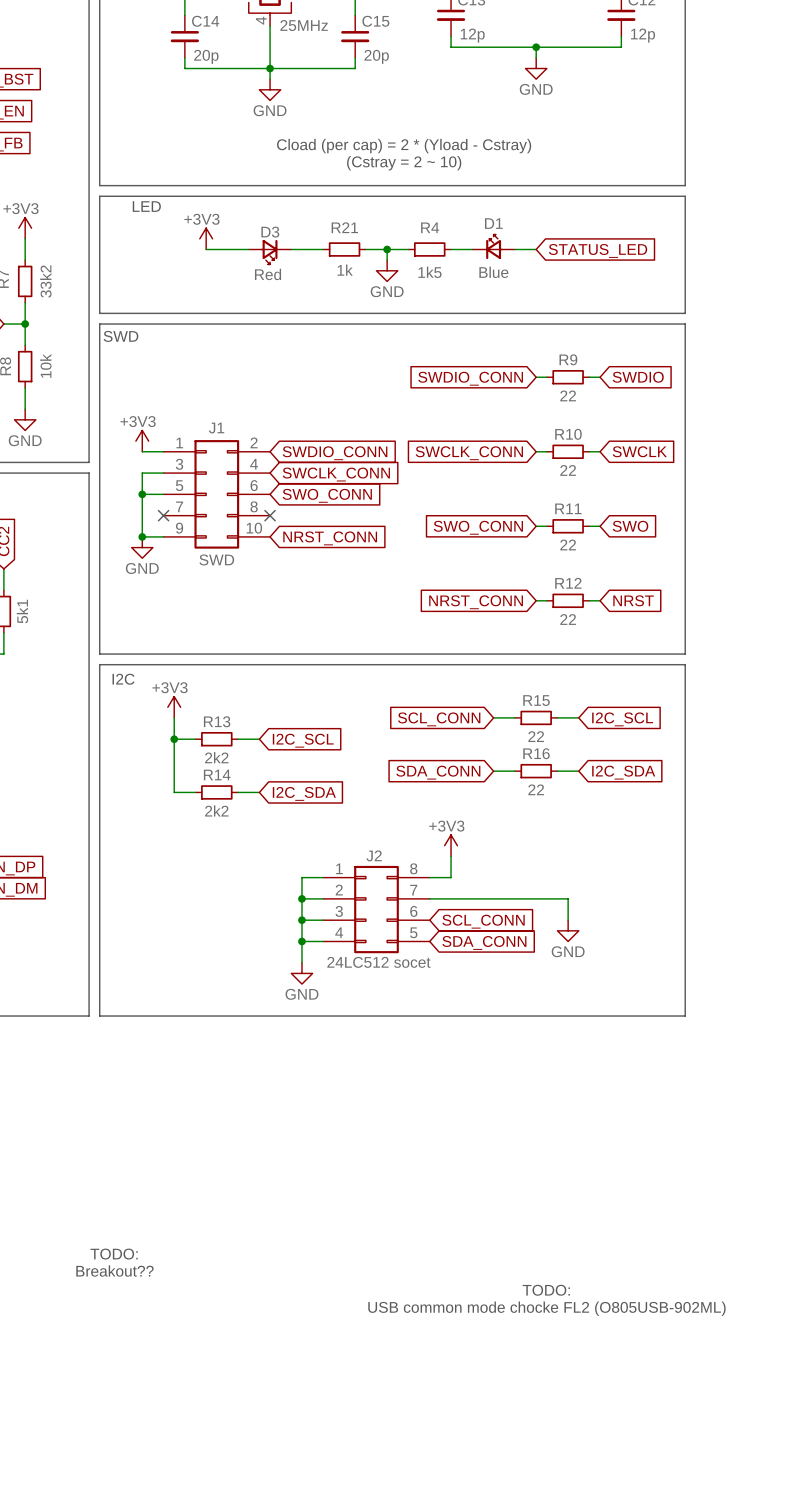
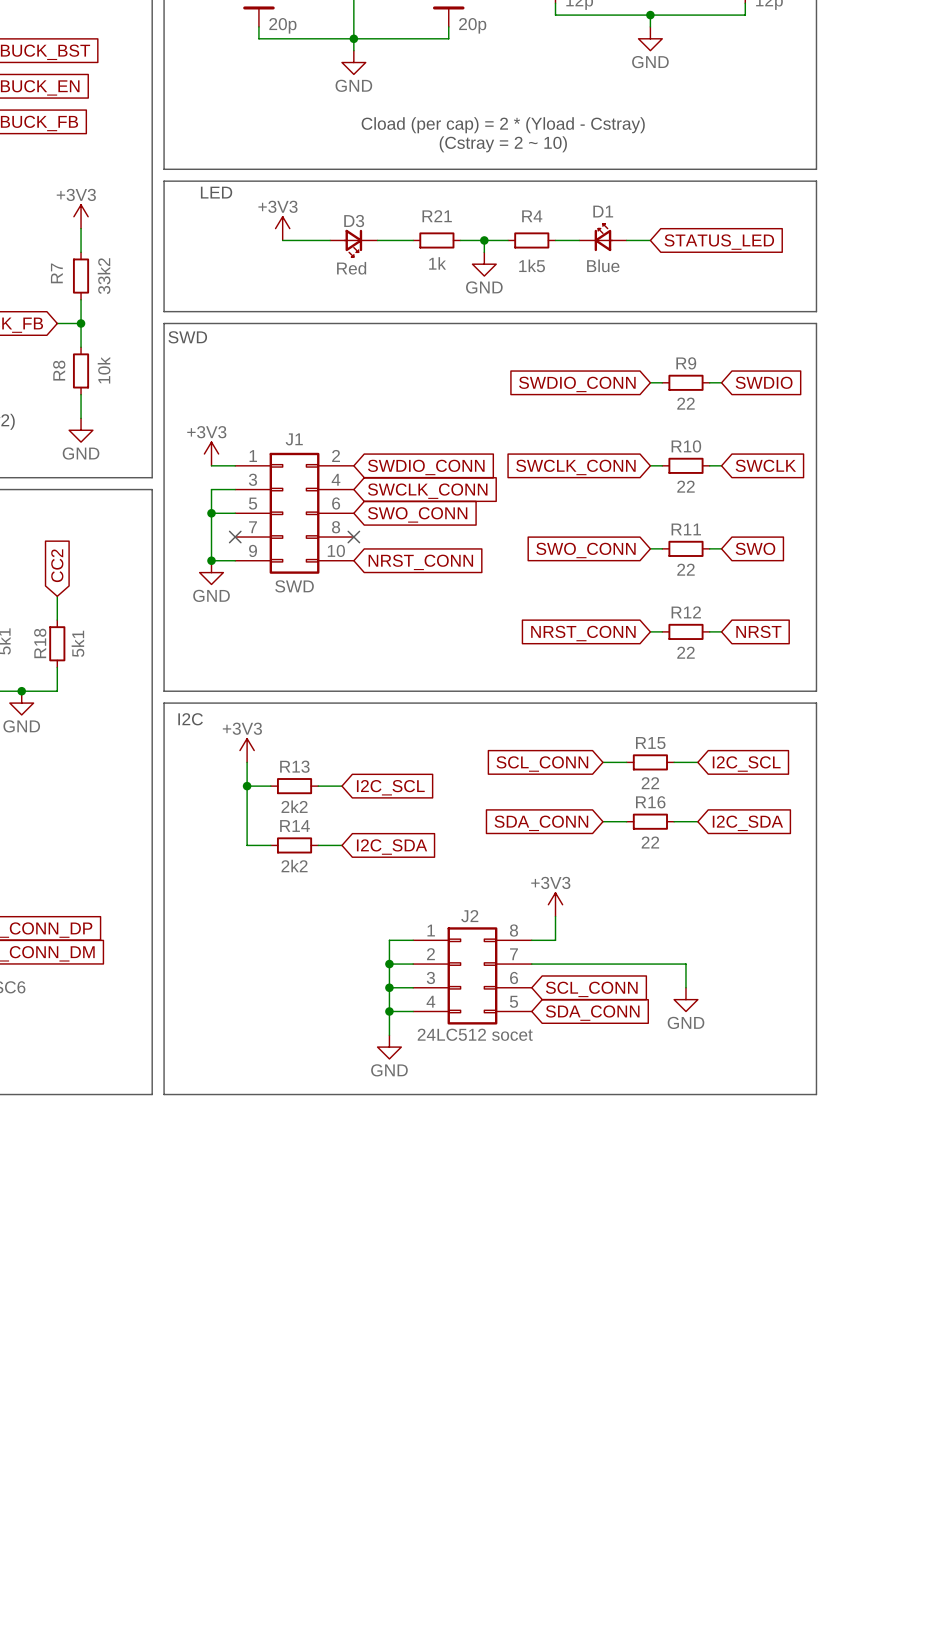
text: TODO: (114, 1254) -> none
text: Breakout?? (114, 1271) -> none
text: TODO: (546, 1290) -> none
text: USB common mode chocke FL2 (O805USB-902ML) (546, 1308) -> none

